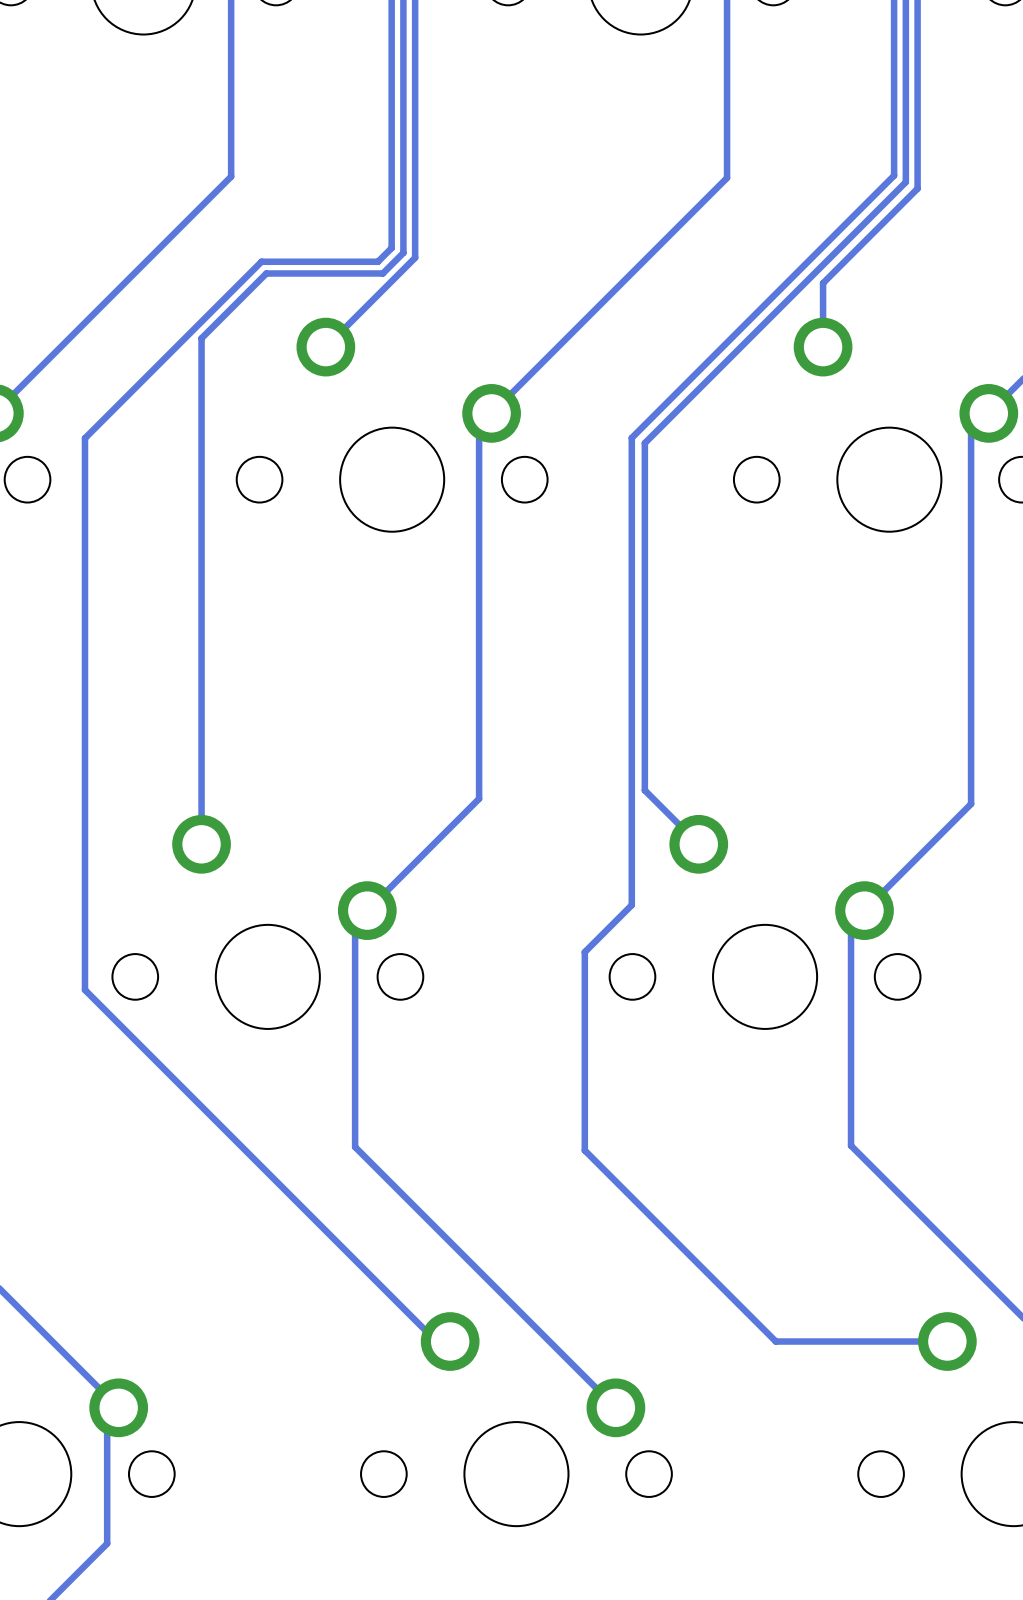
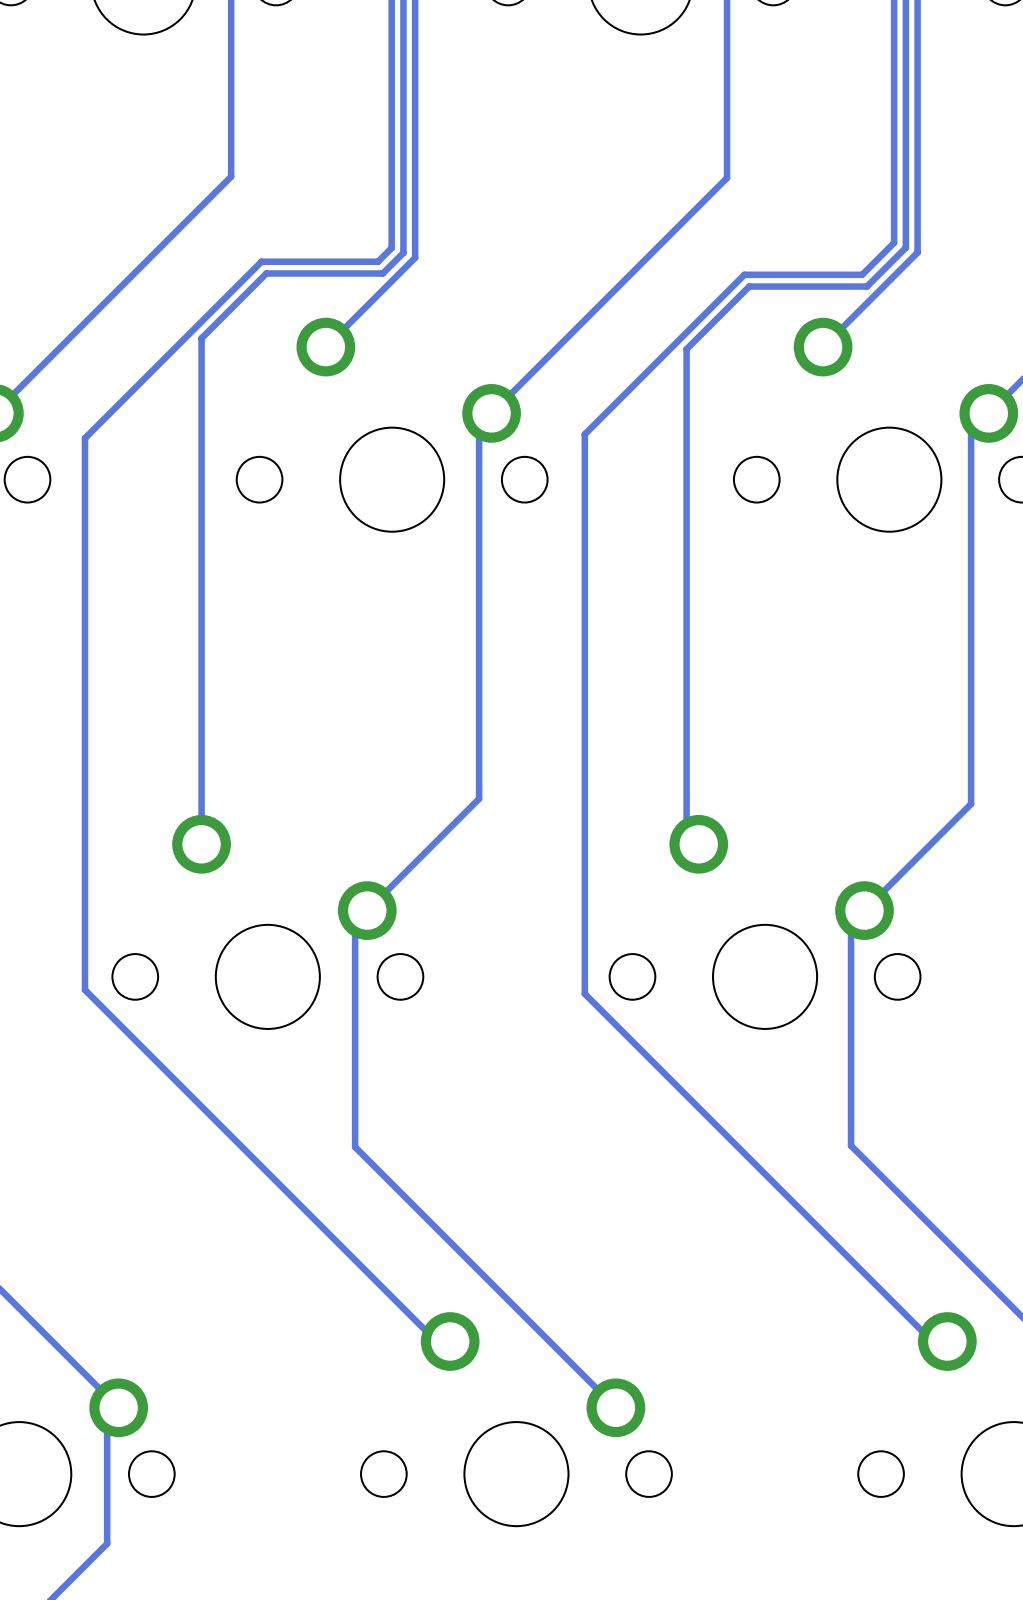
track: (894, 175) (631, 437) (631, 905) (584, 952) -> (894, 175) (894, 242) (862, 274) (744, 274) (584, 434) (584, 952)
track: (905, 182) (644, 443) (644, 790) (686, 832) -> (905, 182) (905, 247) (867, 286) (749, 286) (686, 349) (686, 832)
track: (917, 188) (823, 283) (823, 347) -> (917, 188) (917, 252) (823, 347)
track: (584, 993) (584, 1150) (775, 1341) (932, 1341) -> (584, 993) (932, 1341)

